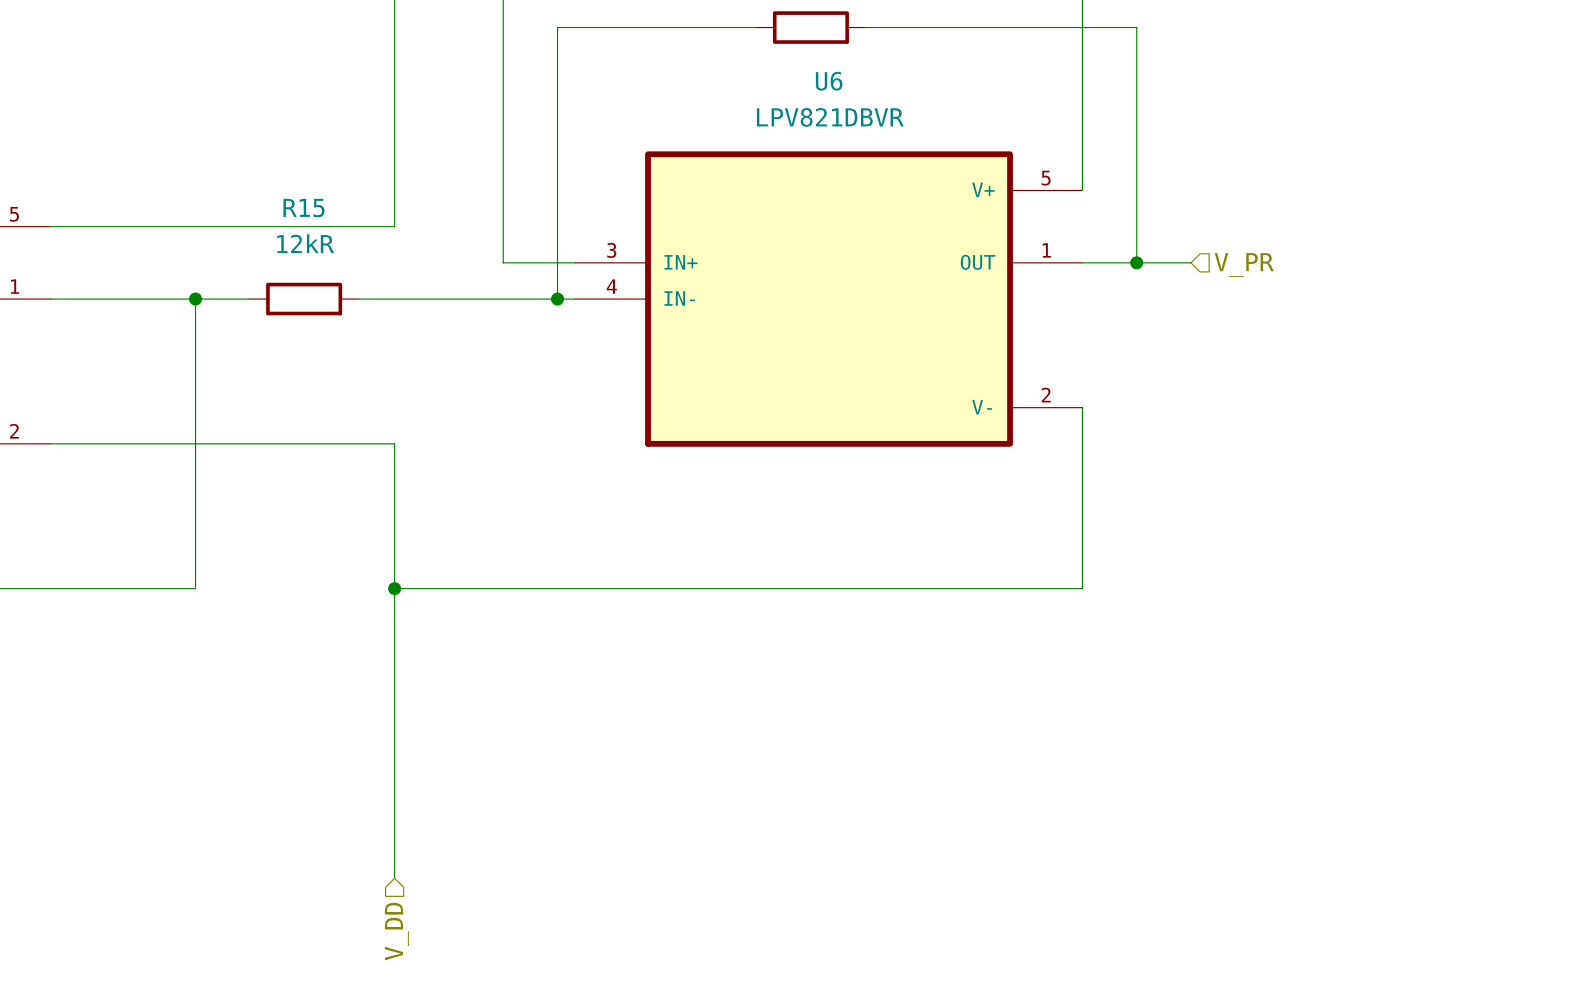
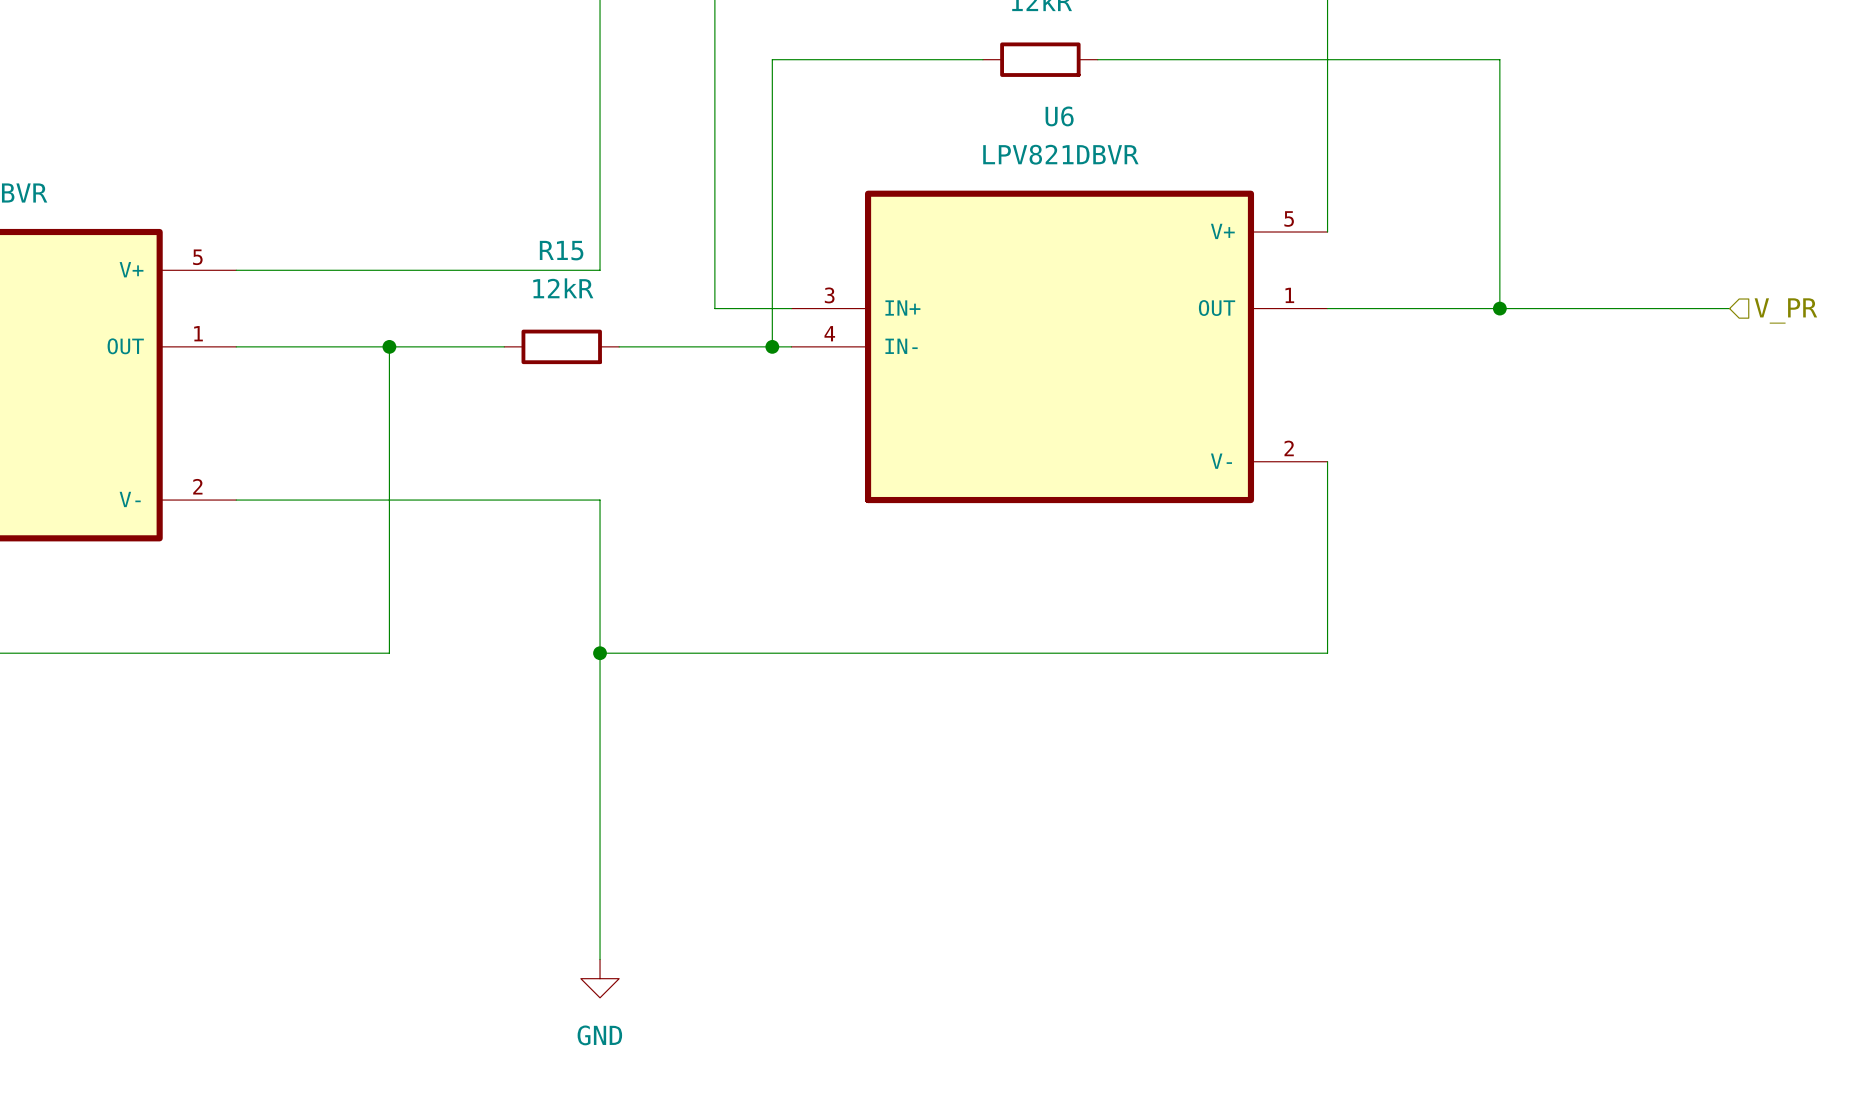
wire: (1136, 27) (1136, 262) -> (1384, 59) (1499, 59) (1499, 308)
junction: (1136, 262) -> none
wire: none -> (1442, 308) (1729, 308)
junction: none -> (1499, 308)
hierarchical label position: V_PR (1244, 265) -> V_PR (1785, 310)
R15 position: (304, 299) -> (561, 346)
wire: (358, 299) (412, 299) -> (446, 346) (504, 346)
power symbol: none -> GND (600, 978)
hierarchical label: V_DD (396, 931) -> none

